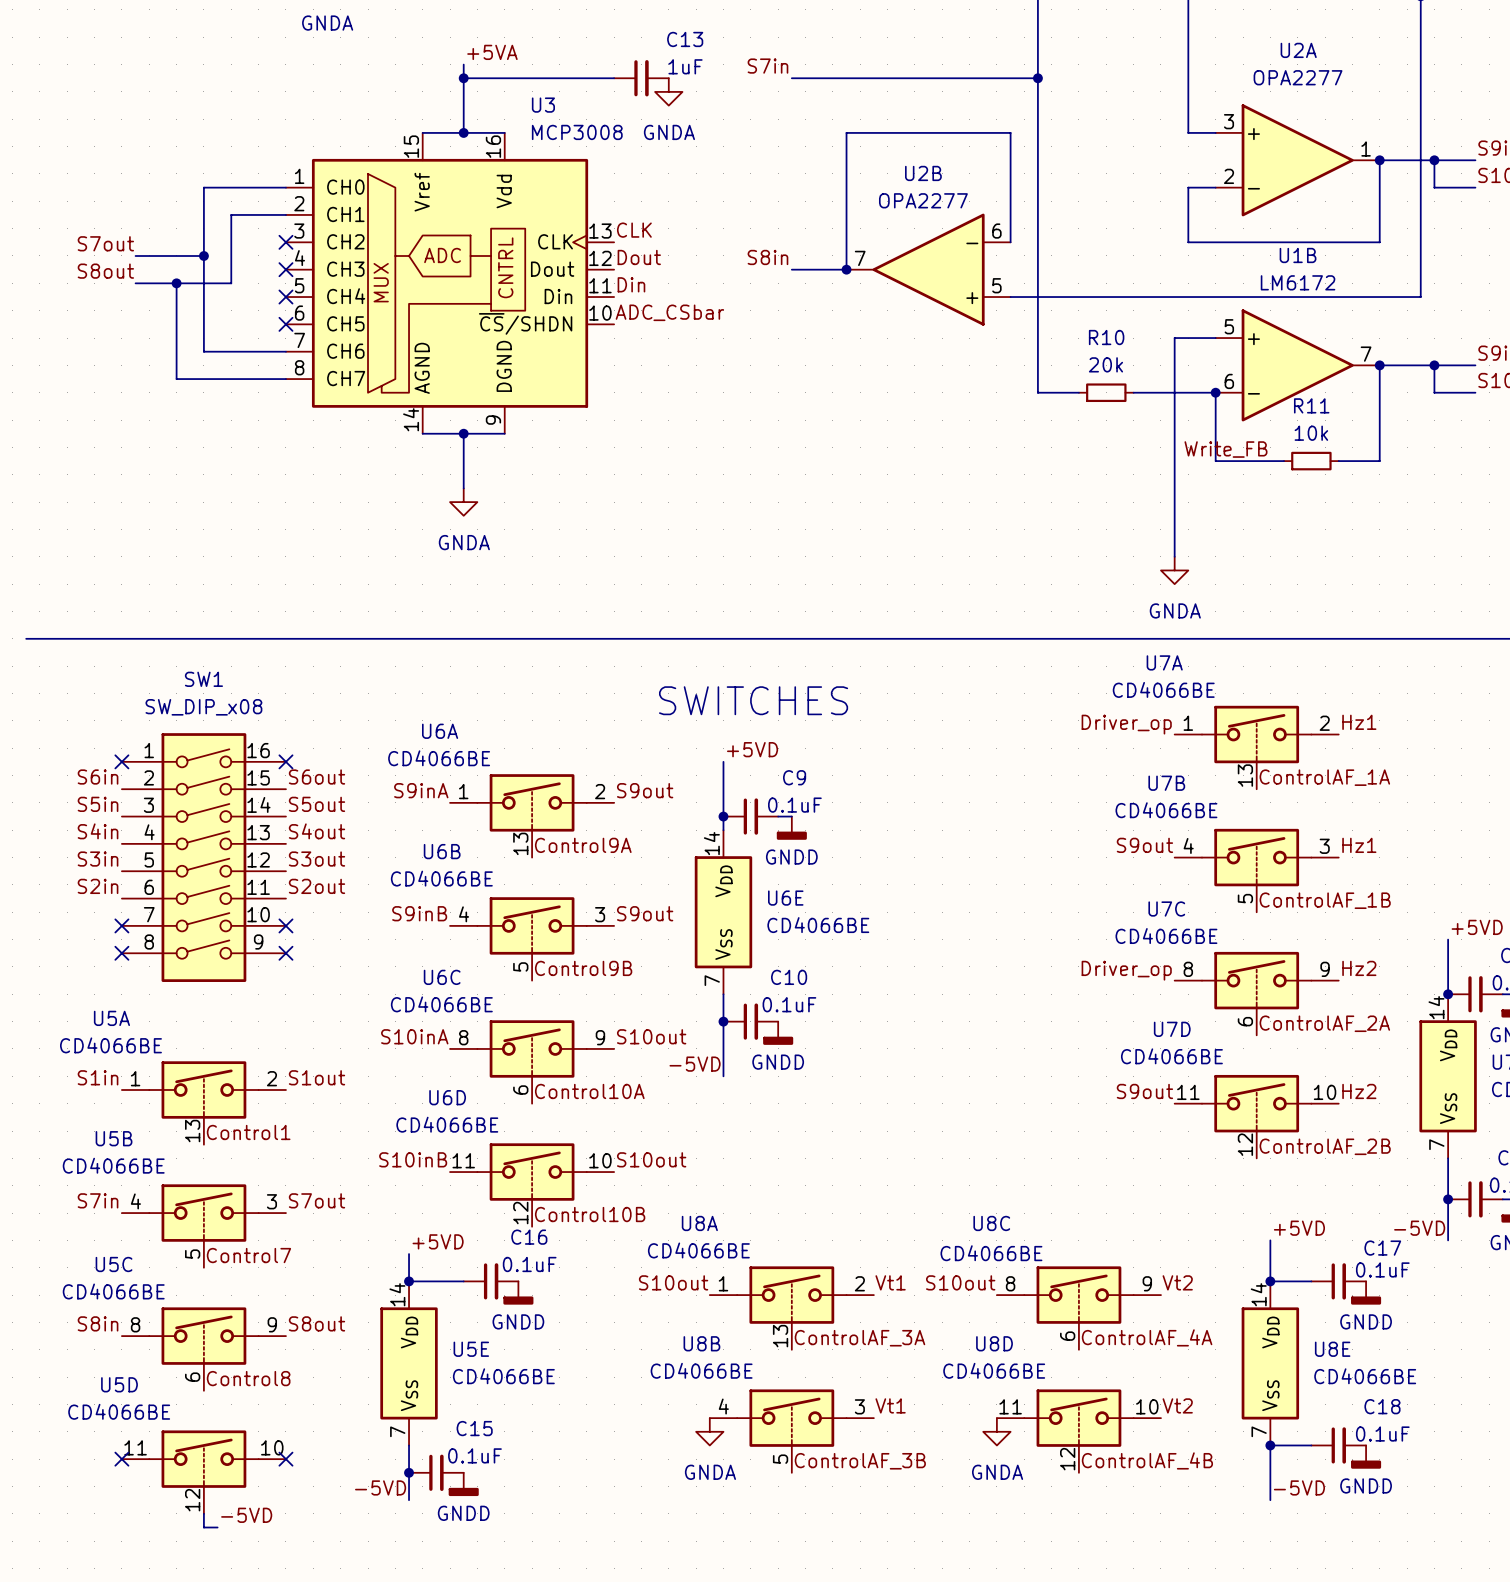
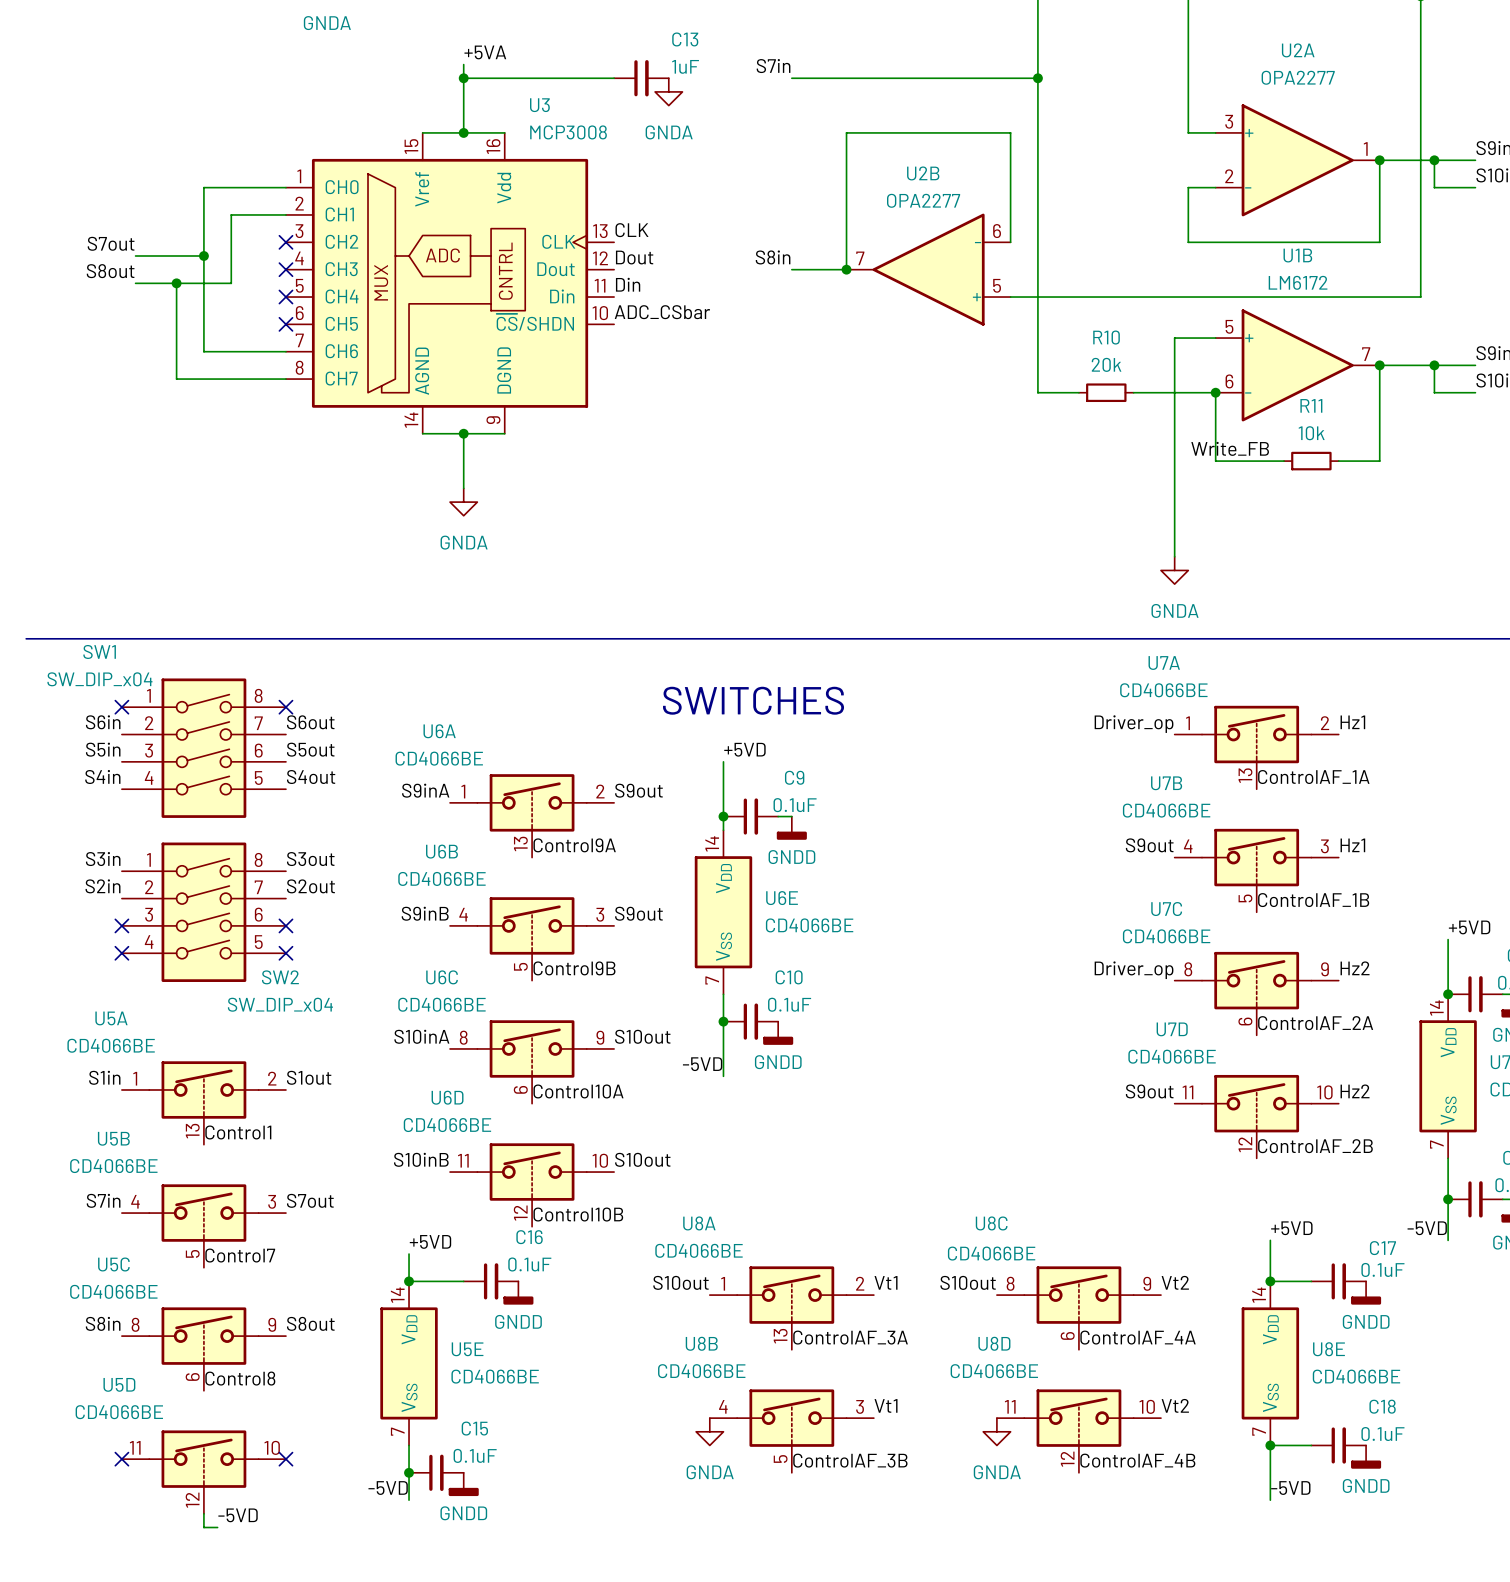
SW1 name position: SW1 (203, 679) -> SW1 (99, 651)
SW1 value: SW_DIP_x08 (203, 707) -> SW_DIP_x04 (99, 679)
label: none -> S6in (103, 722)
label: none -> S6out (310, 722)
SW1 symbol: [121, 733, 286, 982] -> [121, 678, 286, 818]
no-connect mark position: (121, 761) -> (121, 707)
no-connect mark position: (285, 761) -> (285, 707)
label: S6in (98, 777) -> S4in (102, 776)
label: S6out (317, 777) -> S4out (311, 777)
label position: S5in (98, 804) -> S5in (103, 749)
label position: S5out (317, 804) -> S5out (310, 749)
label: S4in (98, 831) -> none
label: S4out (317, 831) -> none
SW2: none -> SW_DIP_x04 (203, 912)

